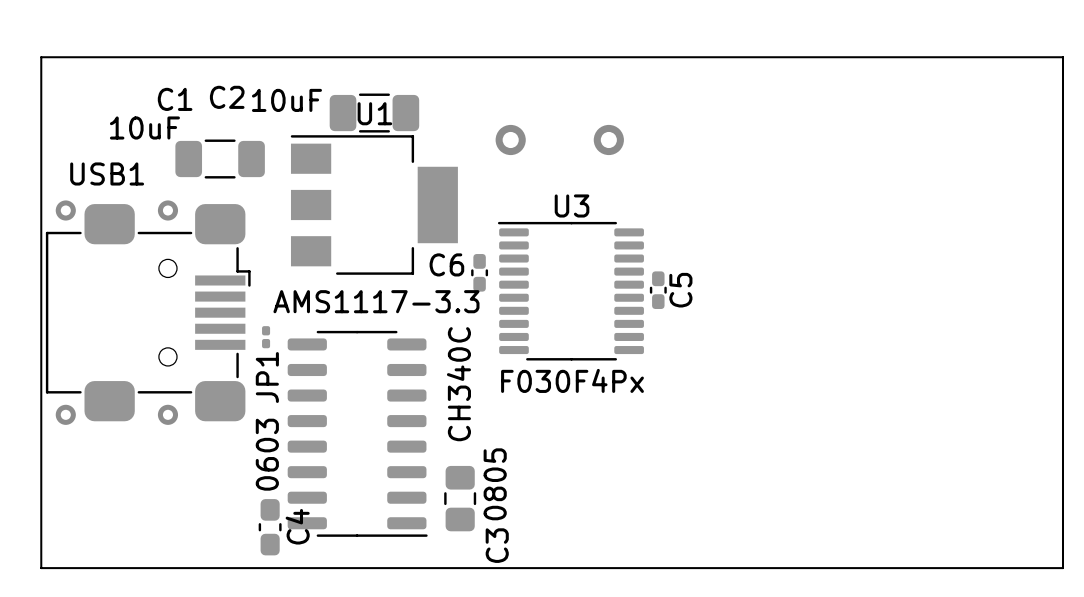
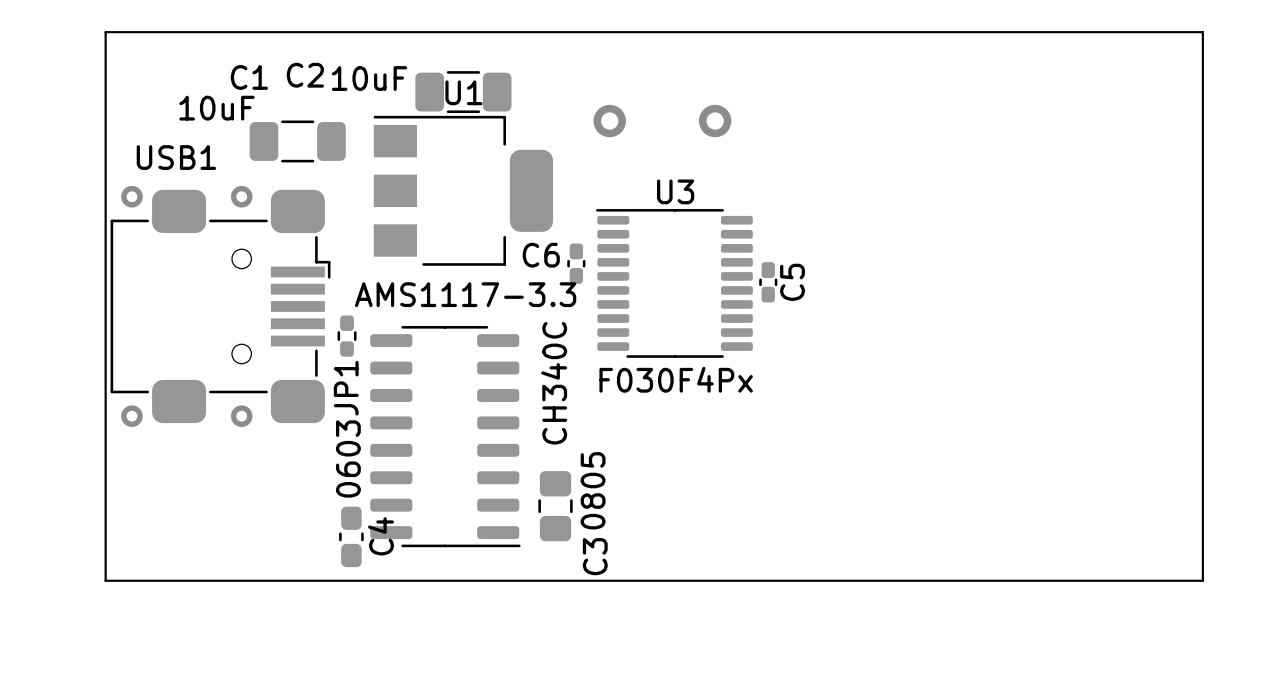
U1 footprint: [290, 135, 458, 275] -> [373, 115, 554, 266]
JP1 footprint: [262, 326, 271, 349] -> [337, 315, 357, 357]

